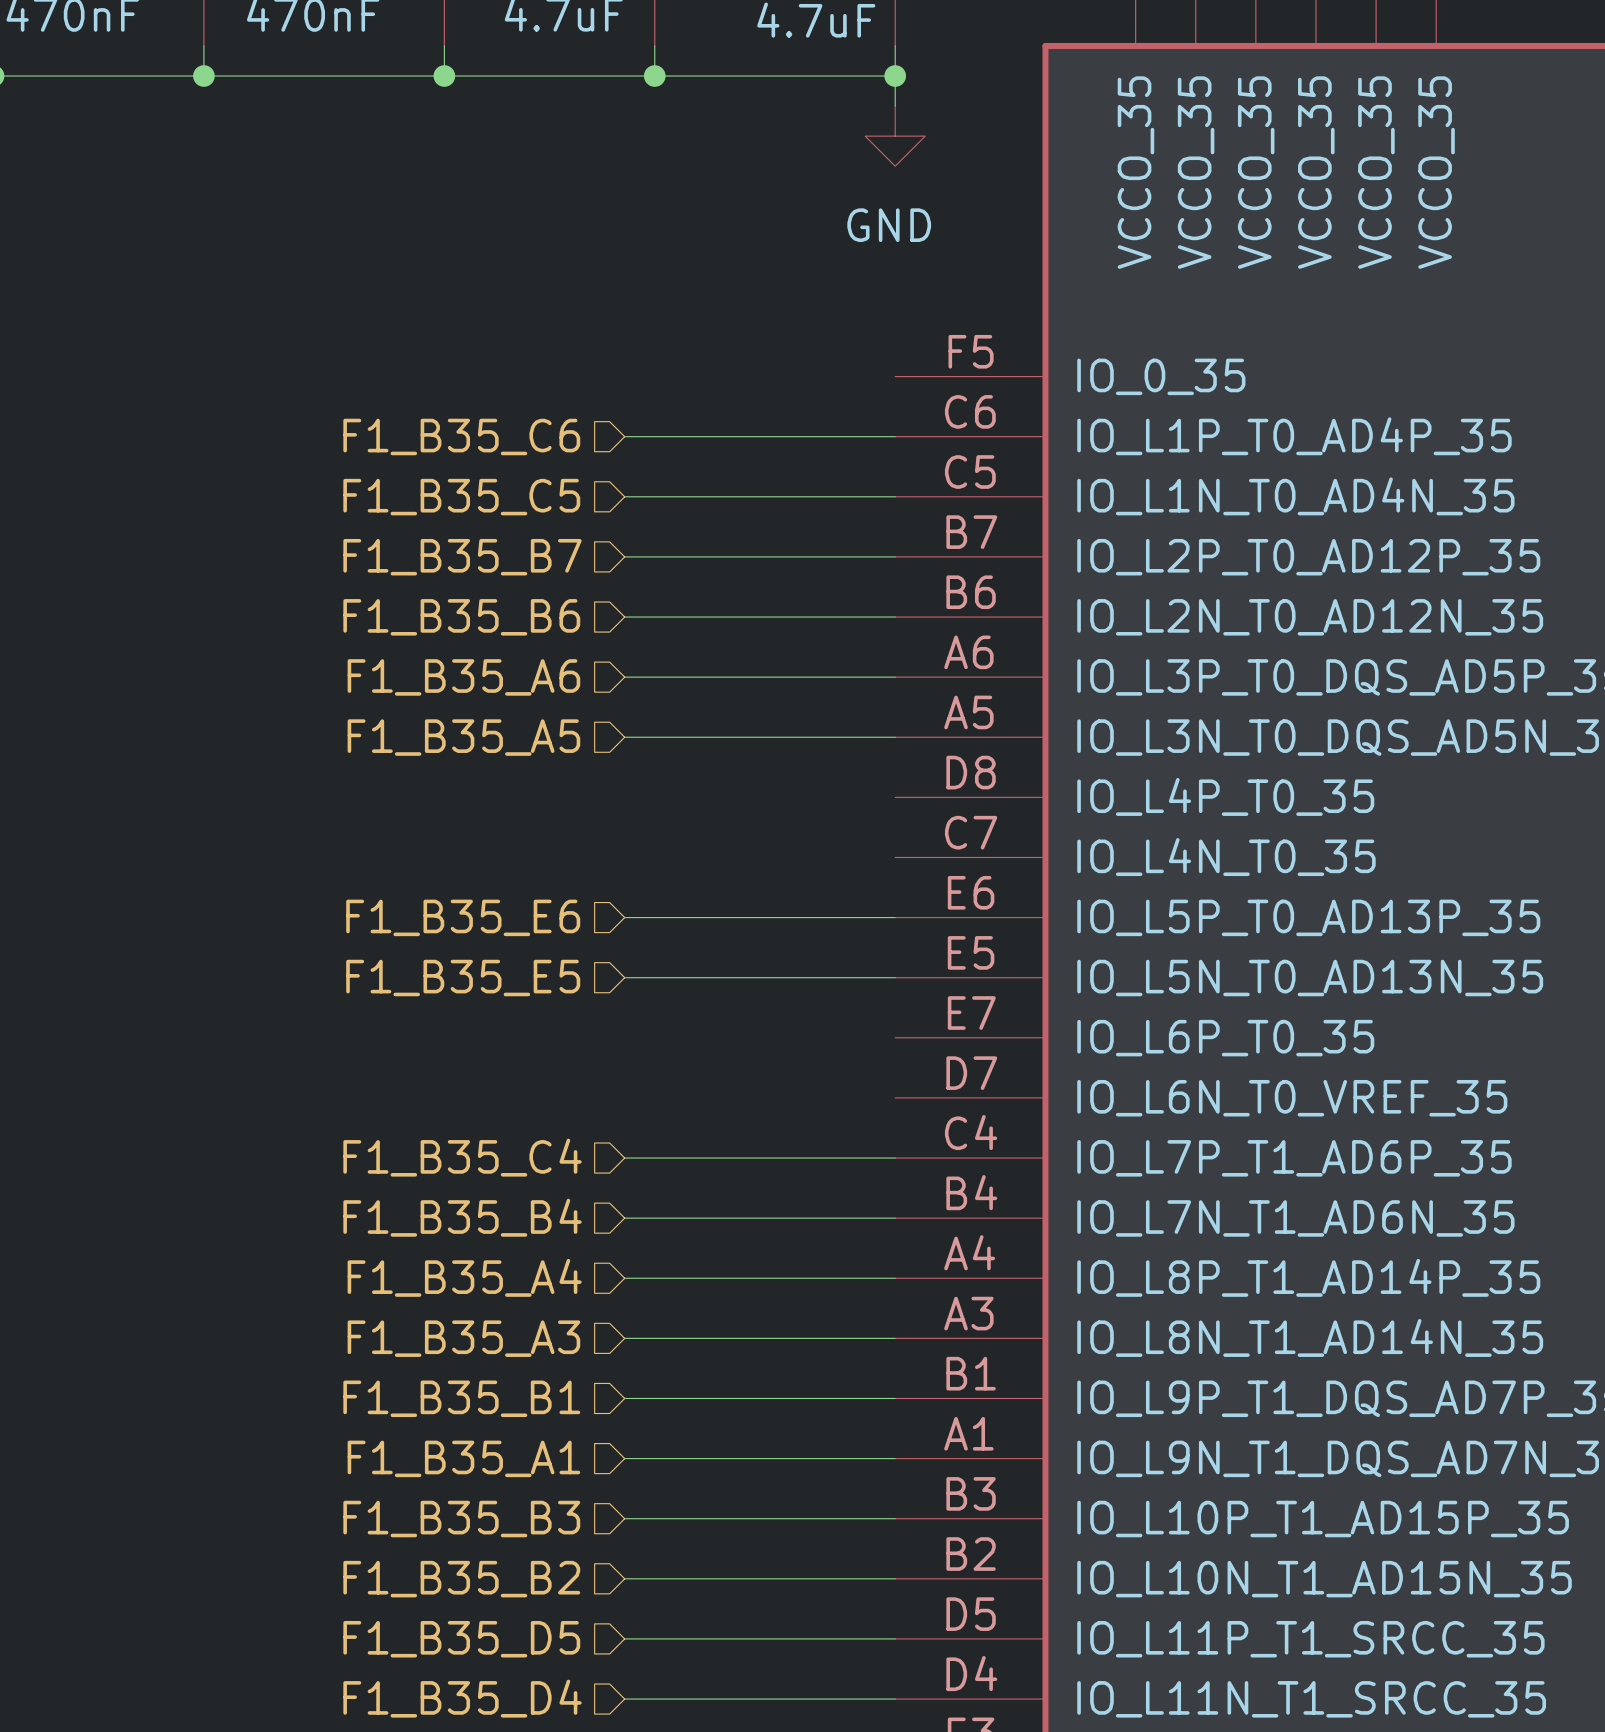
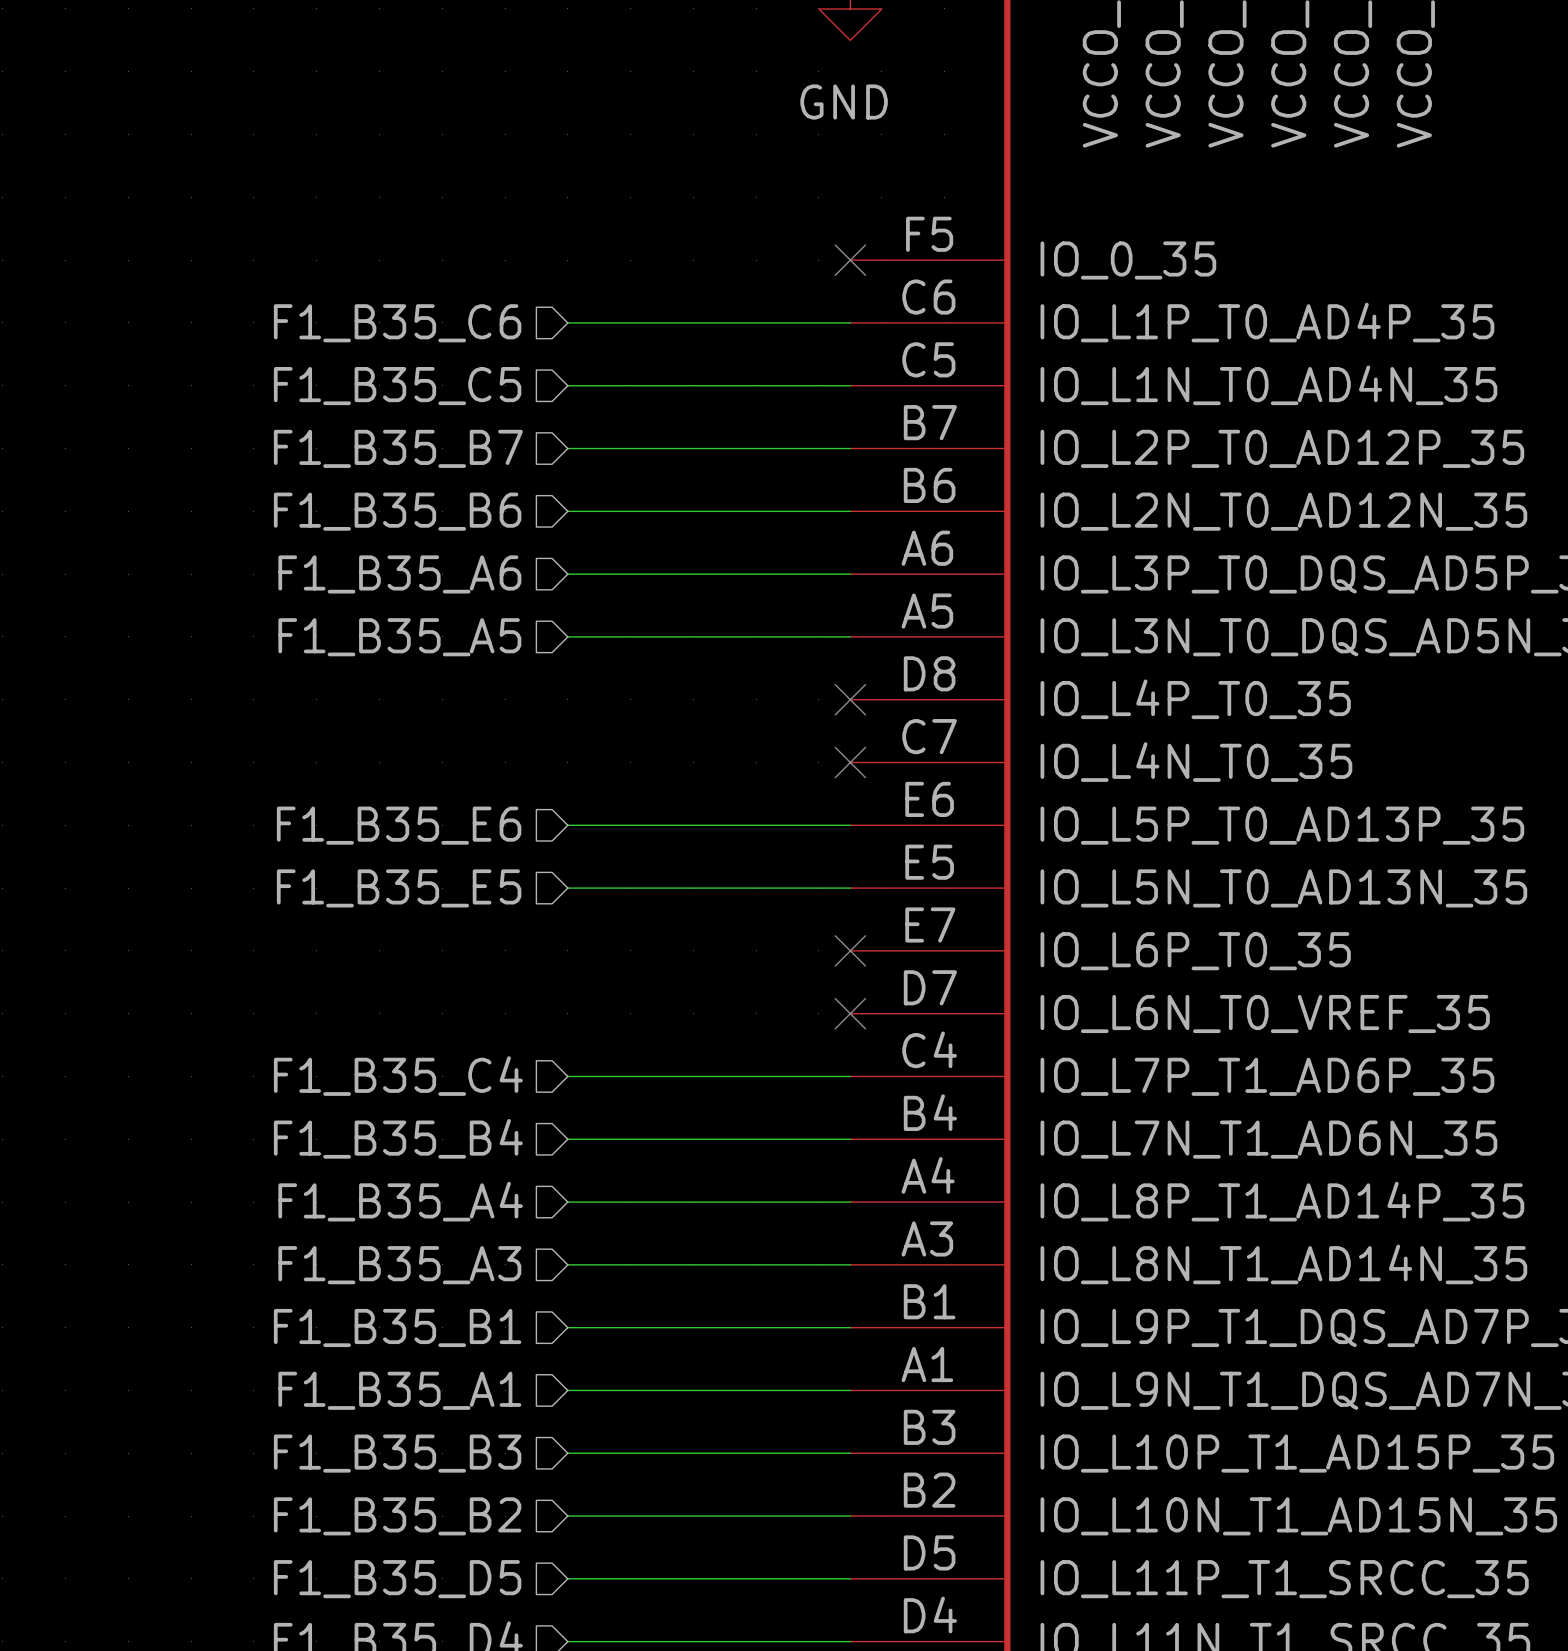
no-connect mark: none -> (850, 260)
no-connect mark: none -> (850, 699)
no-connect mark: none -> (850, 762)
no-connect mark: none -> (850, 950)
no-connect mark: none -> (850, 1013)

